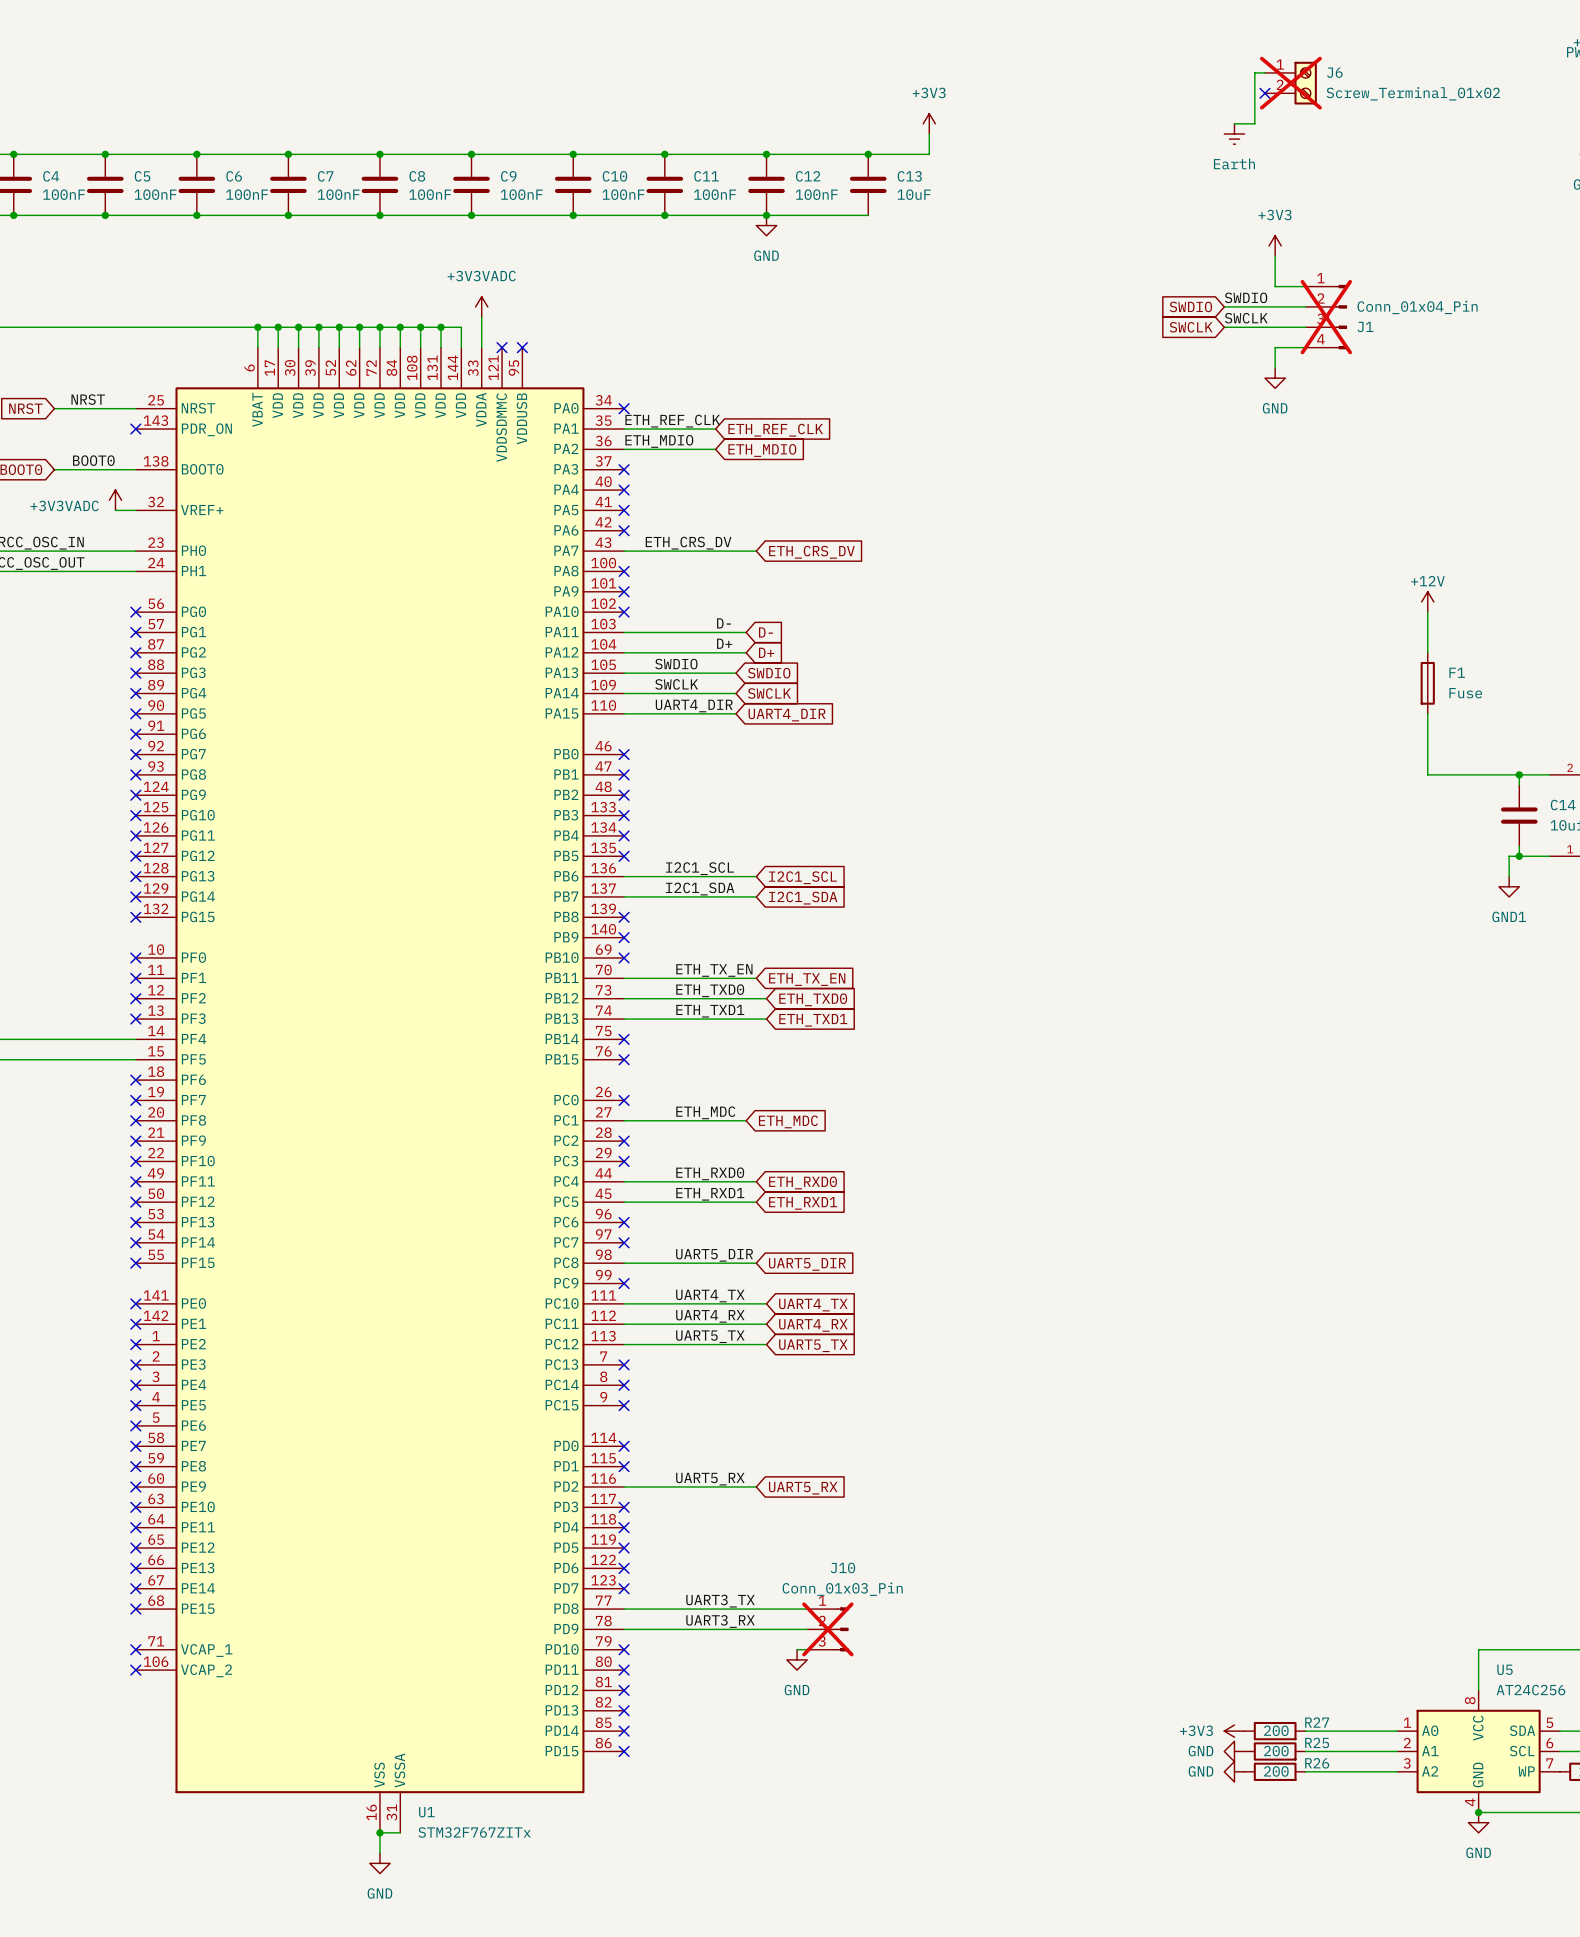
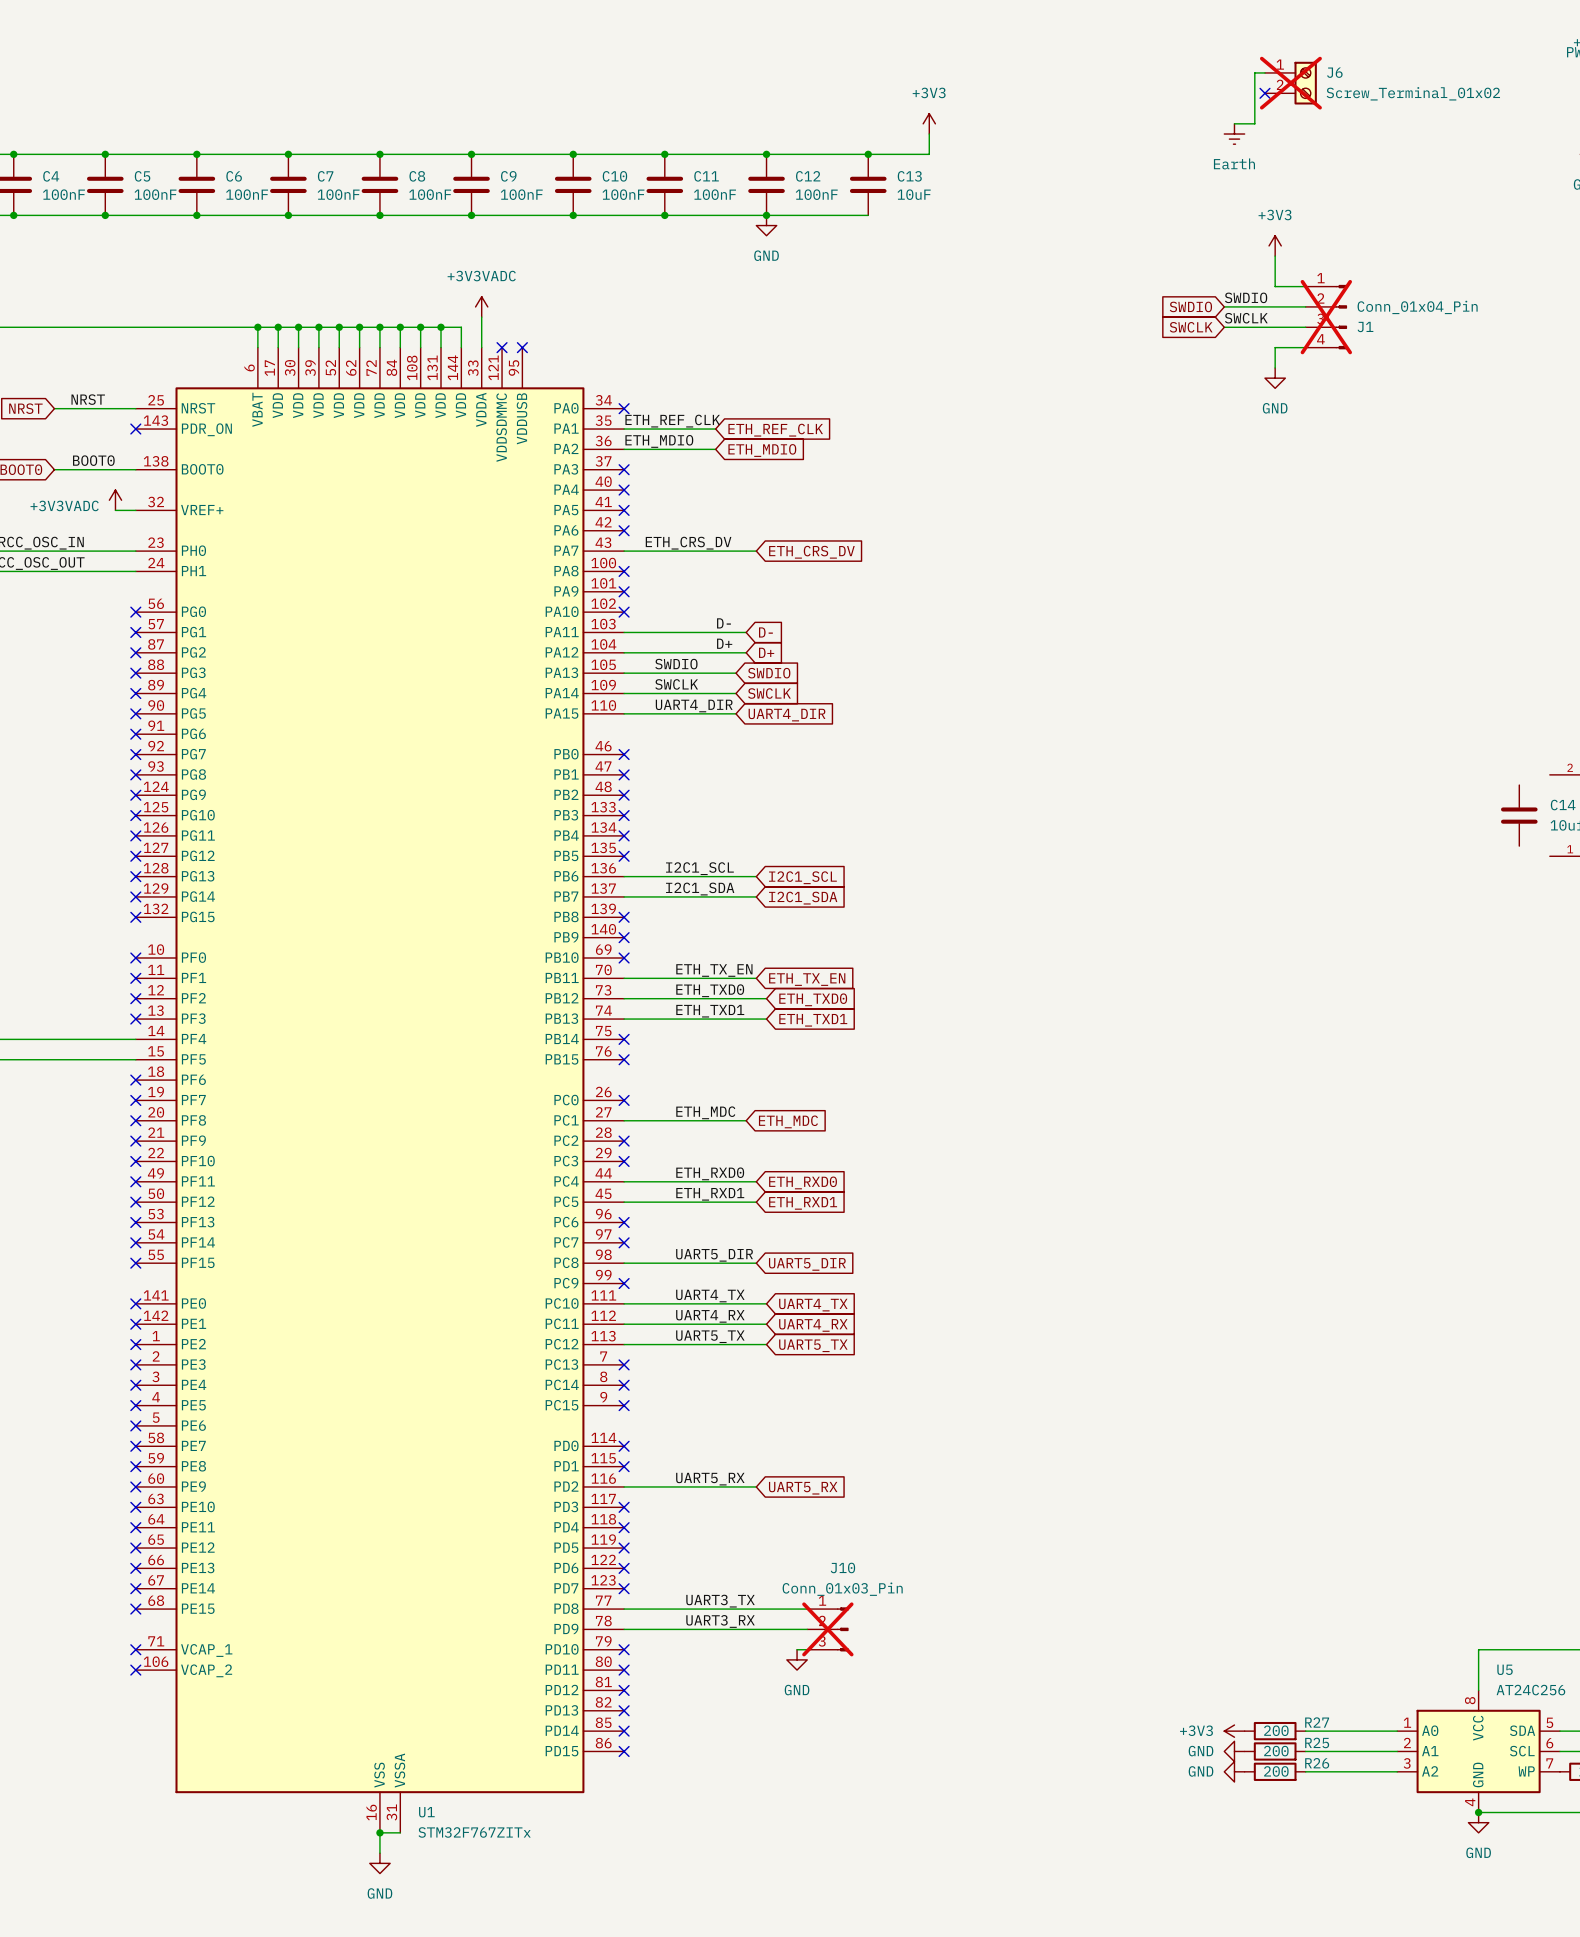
power symbol: +12V (1427, 601) -> none
wire: (1427, 612) (1427, 652) -> none
F1: Fuse (1427, 683) -> none
wire: (1427, 713) (1427, 774) (1549, 774) -> none
wire: (1519, 774) (1519, 785) -> none
junction: (1519, 774) -> none
wire: (1519, 846) (1519, 856) -> none
junction: (1519, 856) -> none
wire: (1549, 856) (1509, 856) (1509, 876) -> none
power symbol: GND1 (1509, 886) -> none

